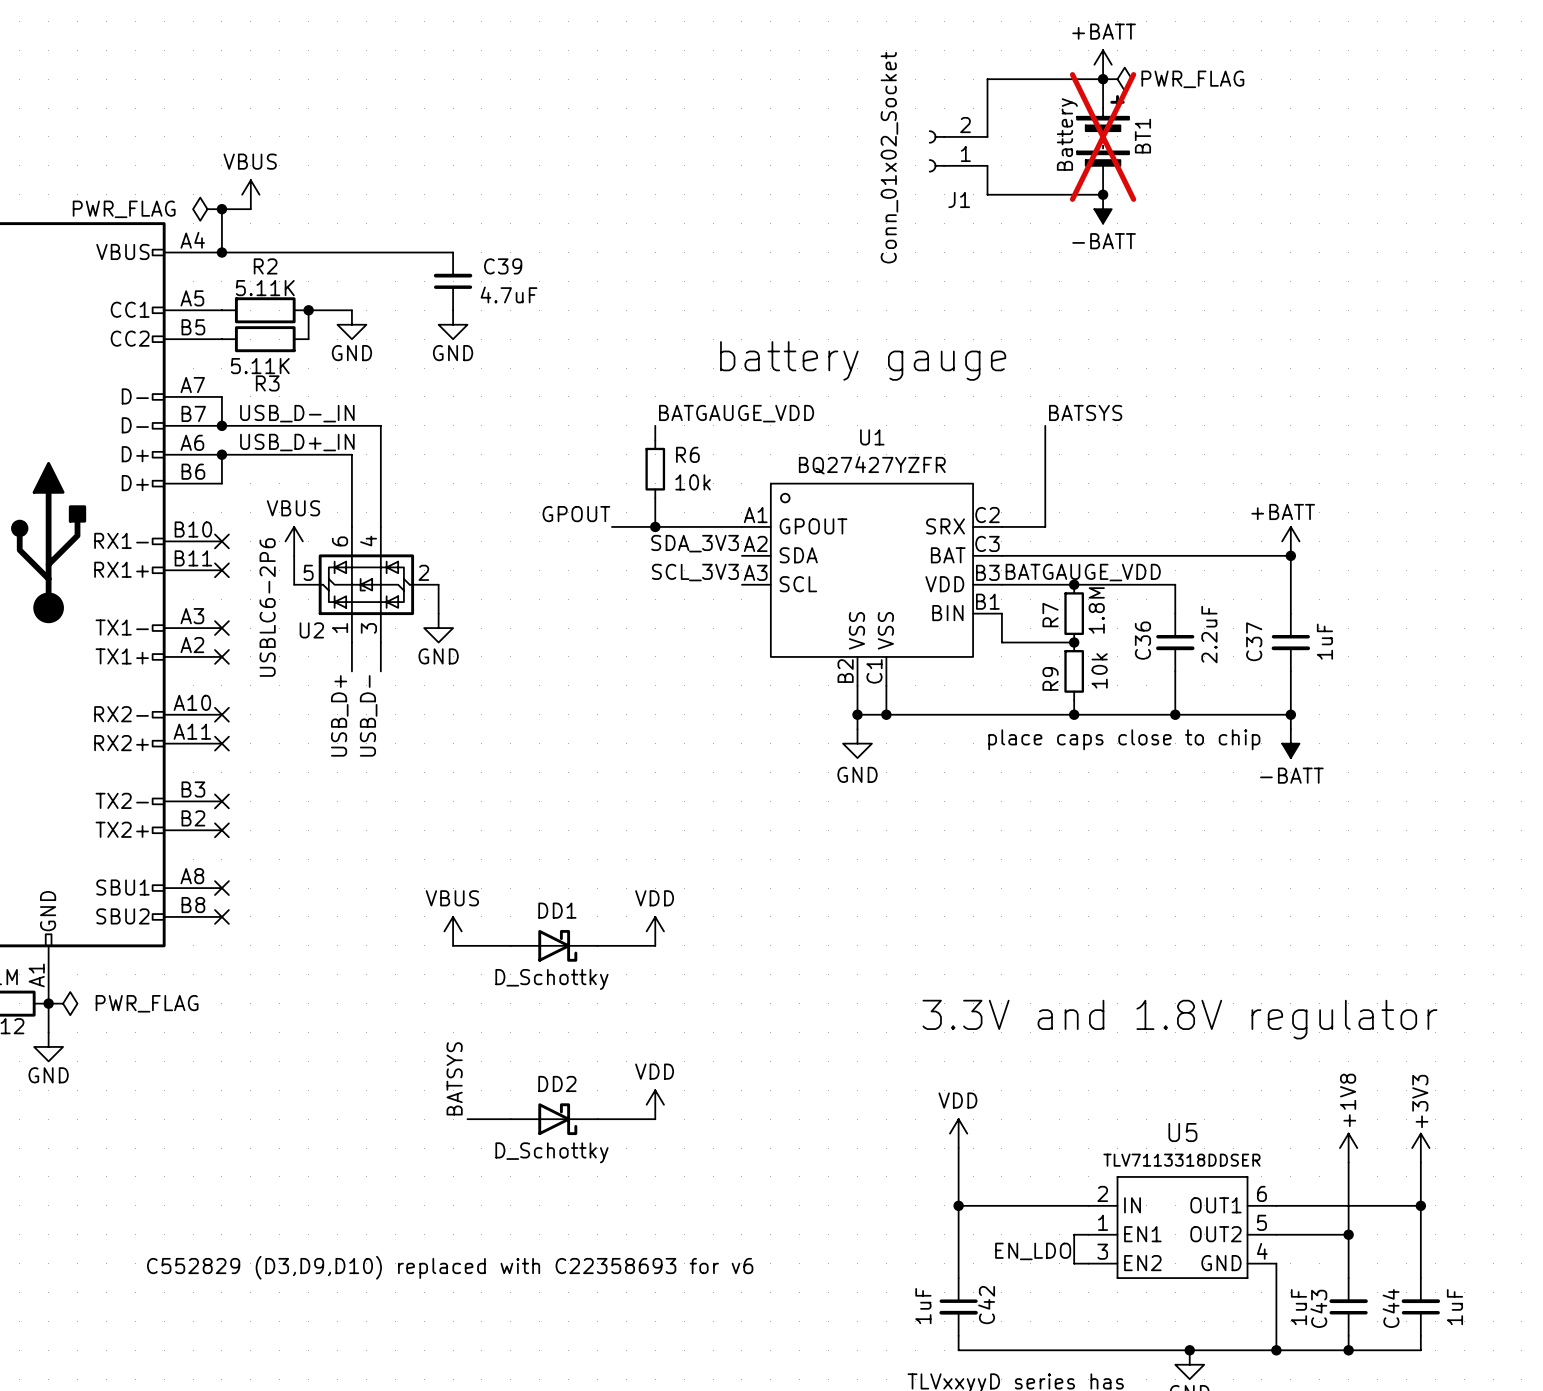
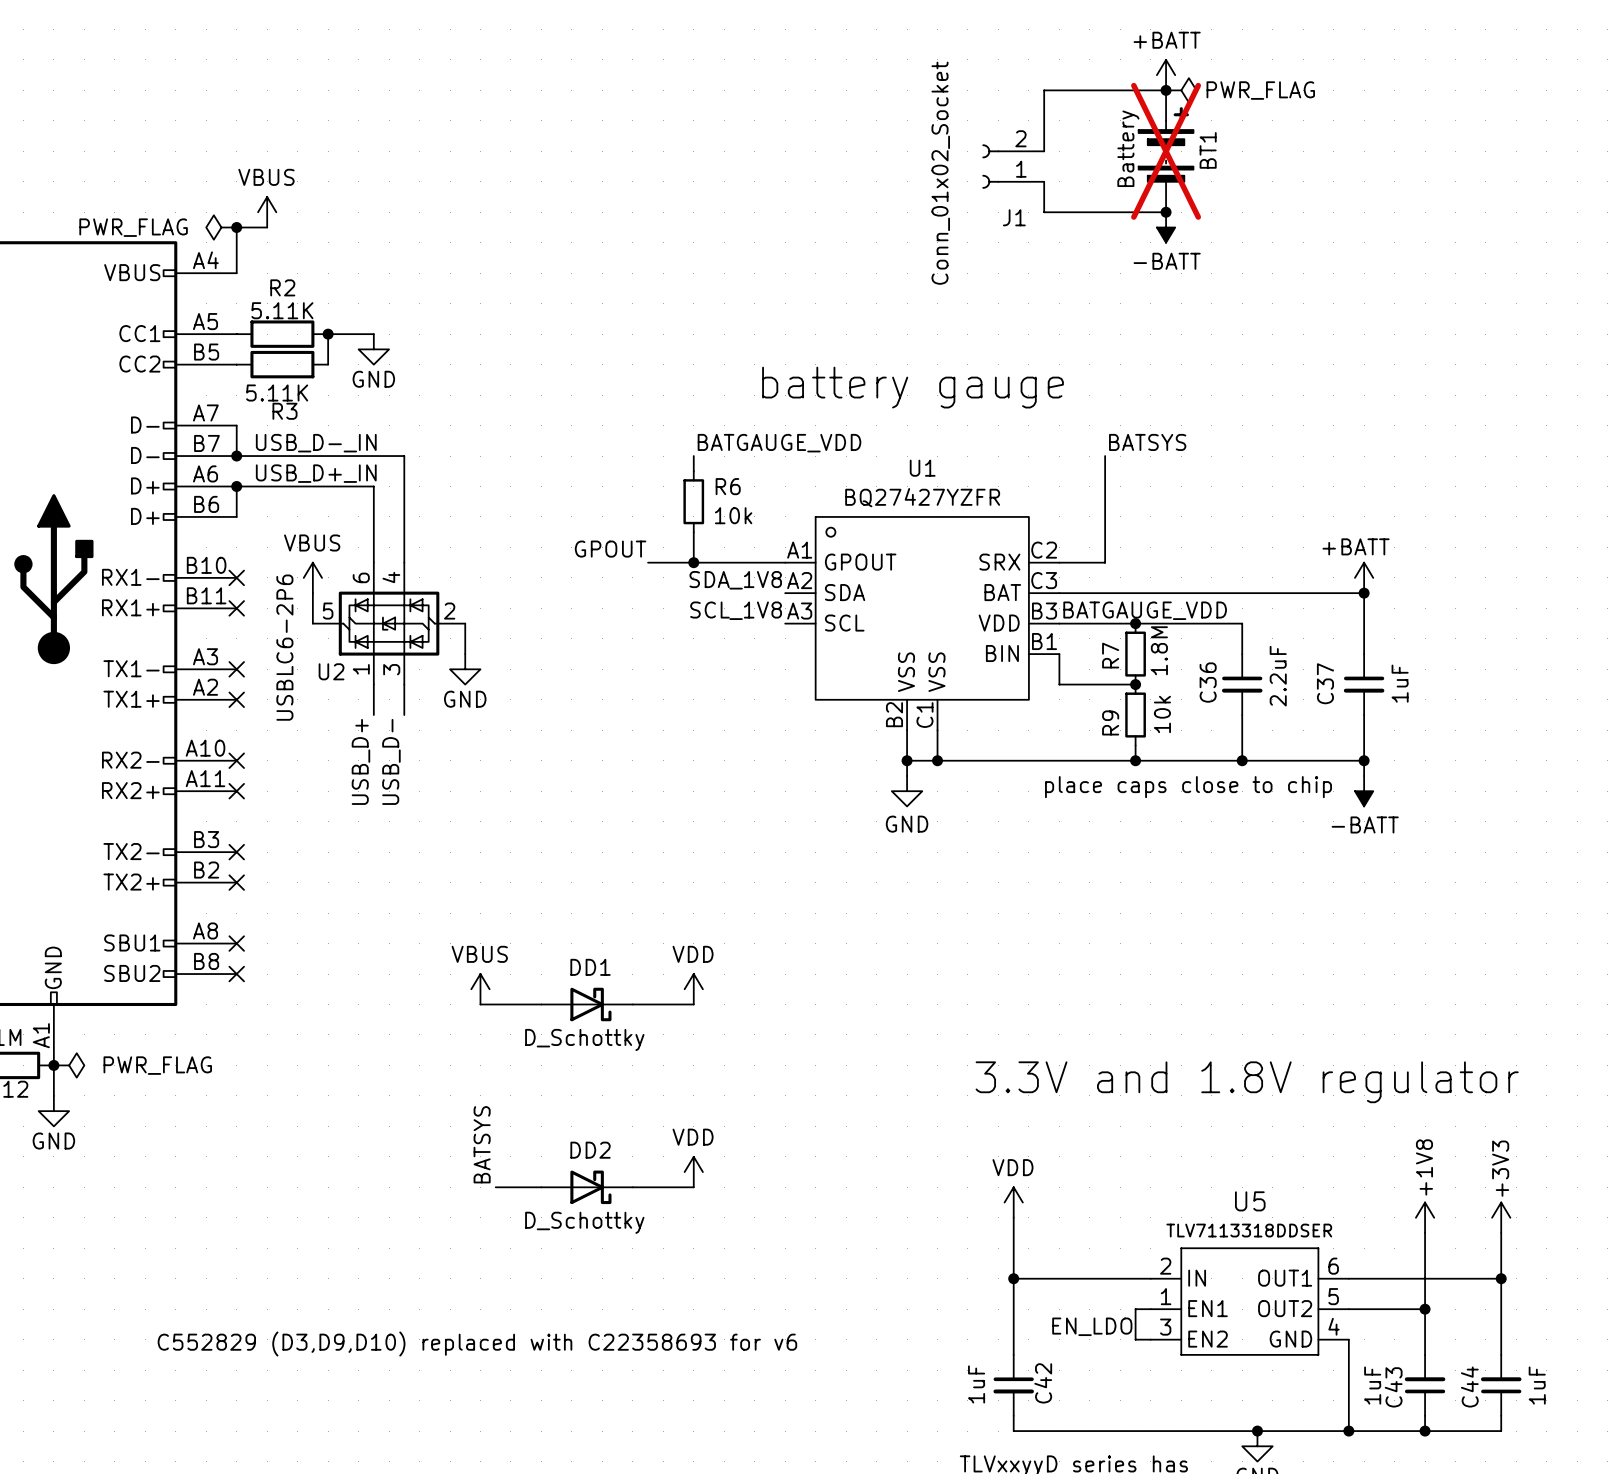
wire: (221, 252) (453, 252) -> none
junction: (221, 252) -> none
C39: 4.7uF (453, 281) -> none
power symbol: GND (453, 324) -> none
label: SDA_3V3 (695, 543) -> SDA_1V8 (735, 580)
label: SCL_3V3 (695, 572) -> SCL_1V8 (736, 610)

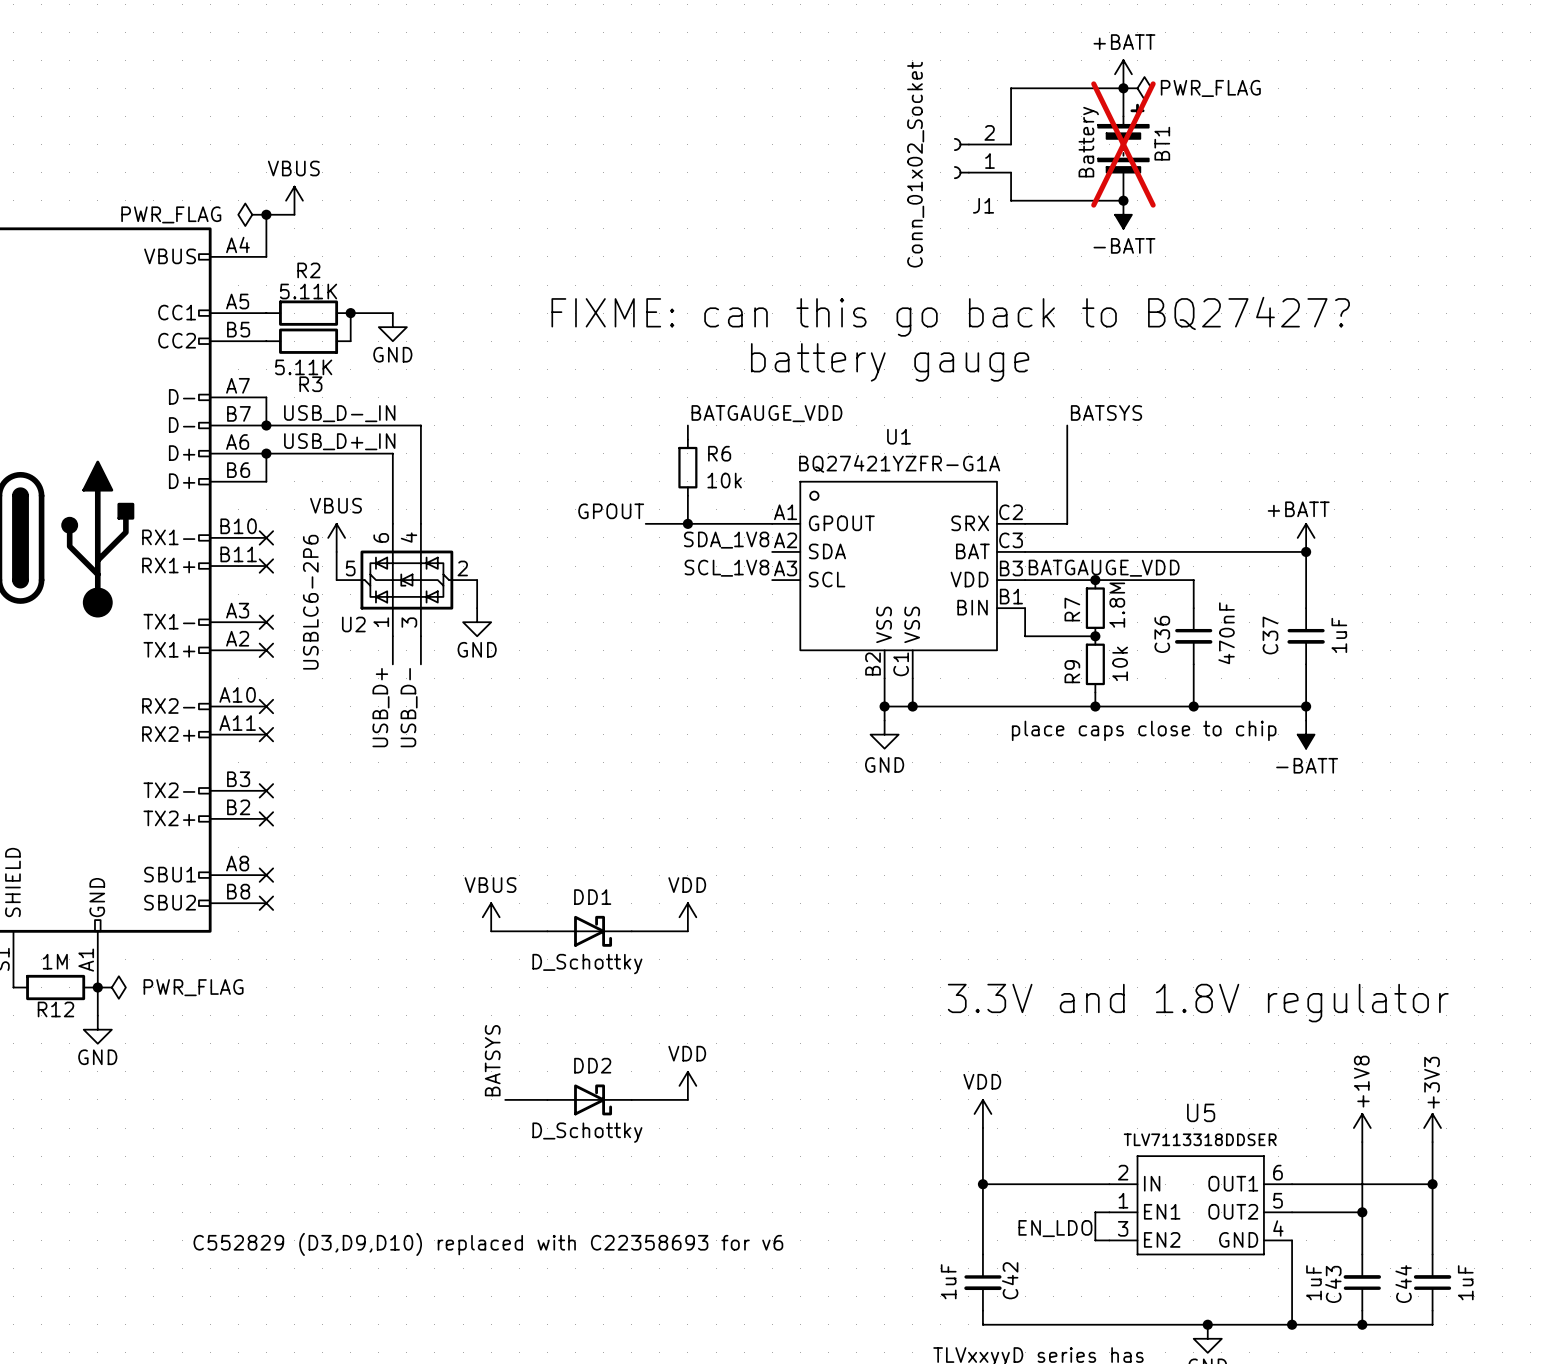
text: none -> FIXME: can this go back to BQ27427? (950, 316)
U1 value: BQ27427YZFR (922, 497) -> BQ27421YZFR-G1A (899, 463)
C36 value: 2.2uF (1278, 676) -> 470nF (1226, 633)

